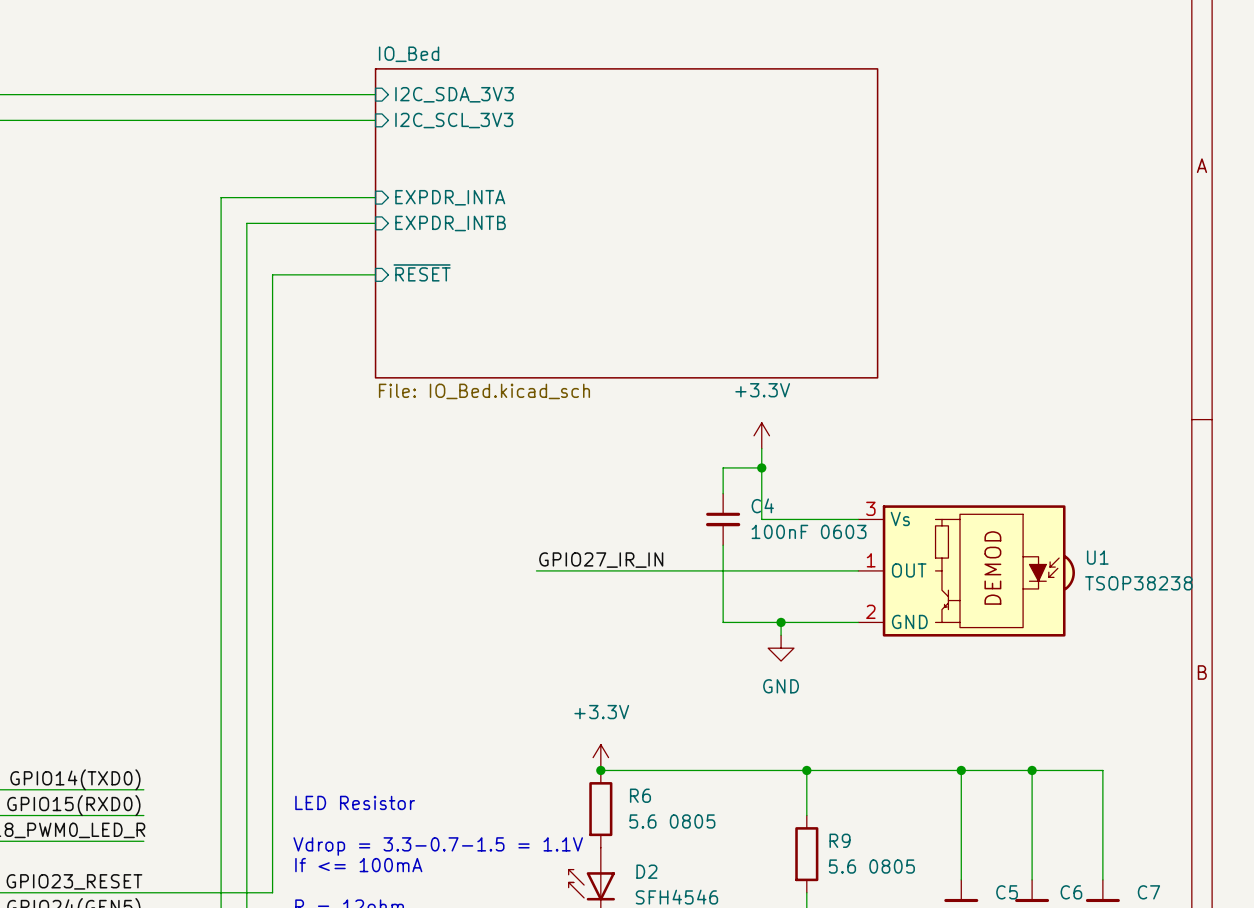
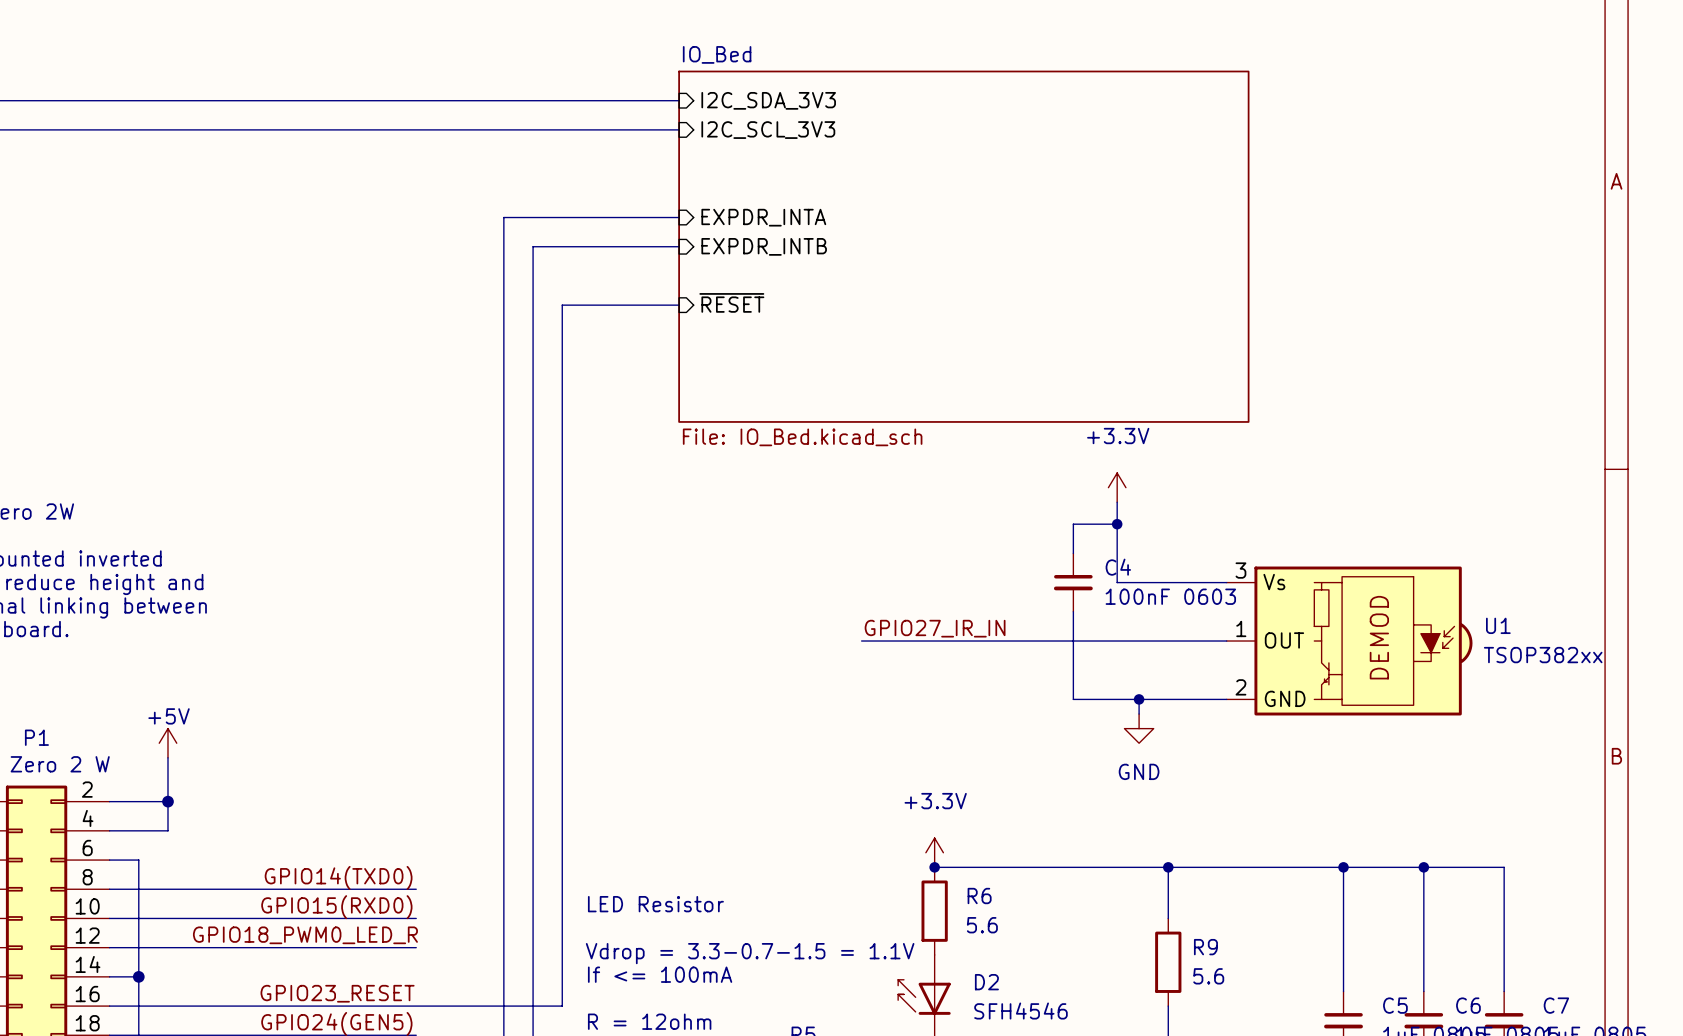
U1 value: TSOP38238 (1138, 583) -> TSOP382xx (1543, 655)
R6 value: 5.6 0805 (672, 821) -> 5.6 (982, 925)
R9 value: 5.6 0805 (871, 866) -> 5.6 (1208, 976)

